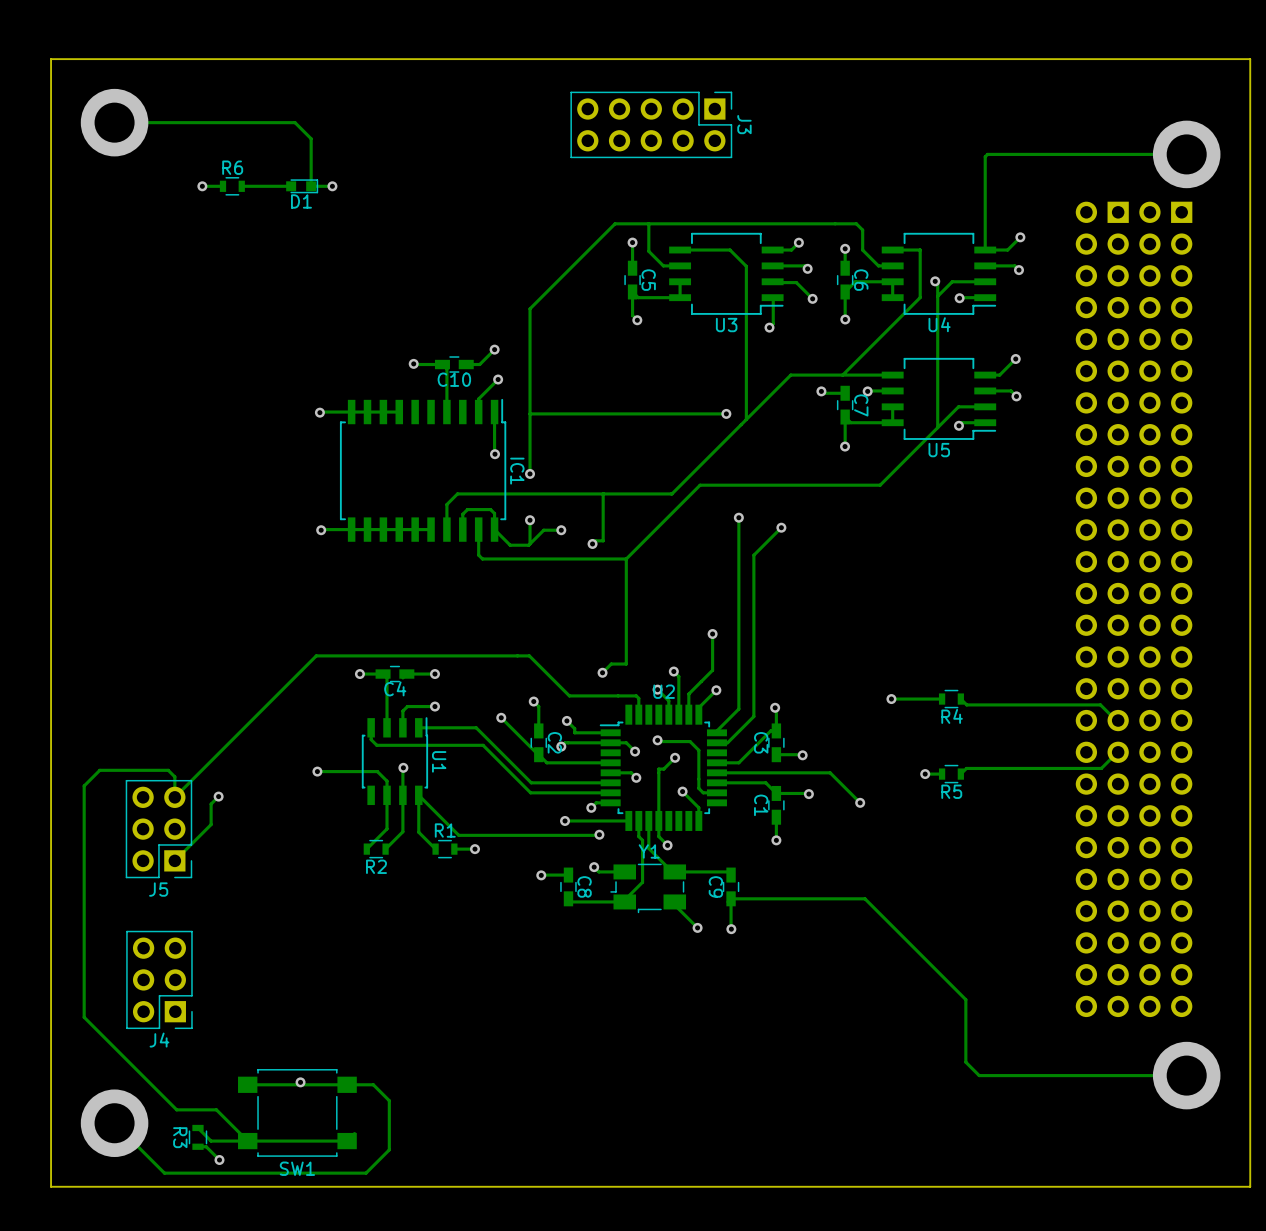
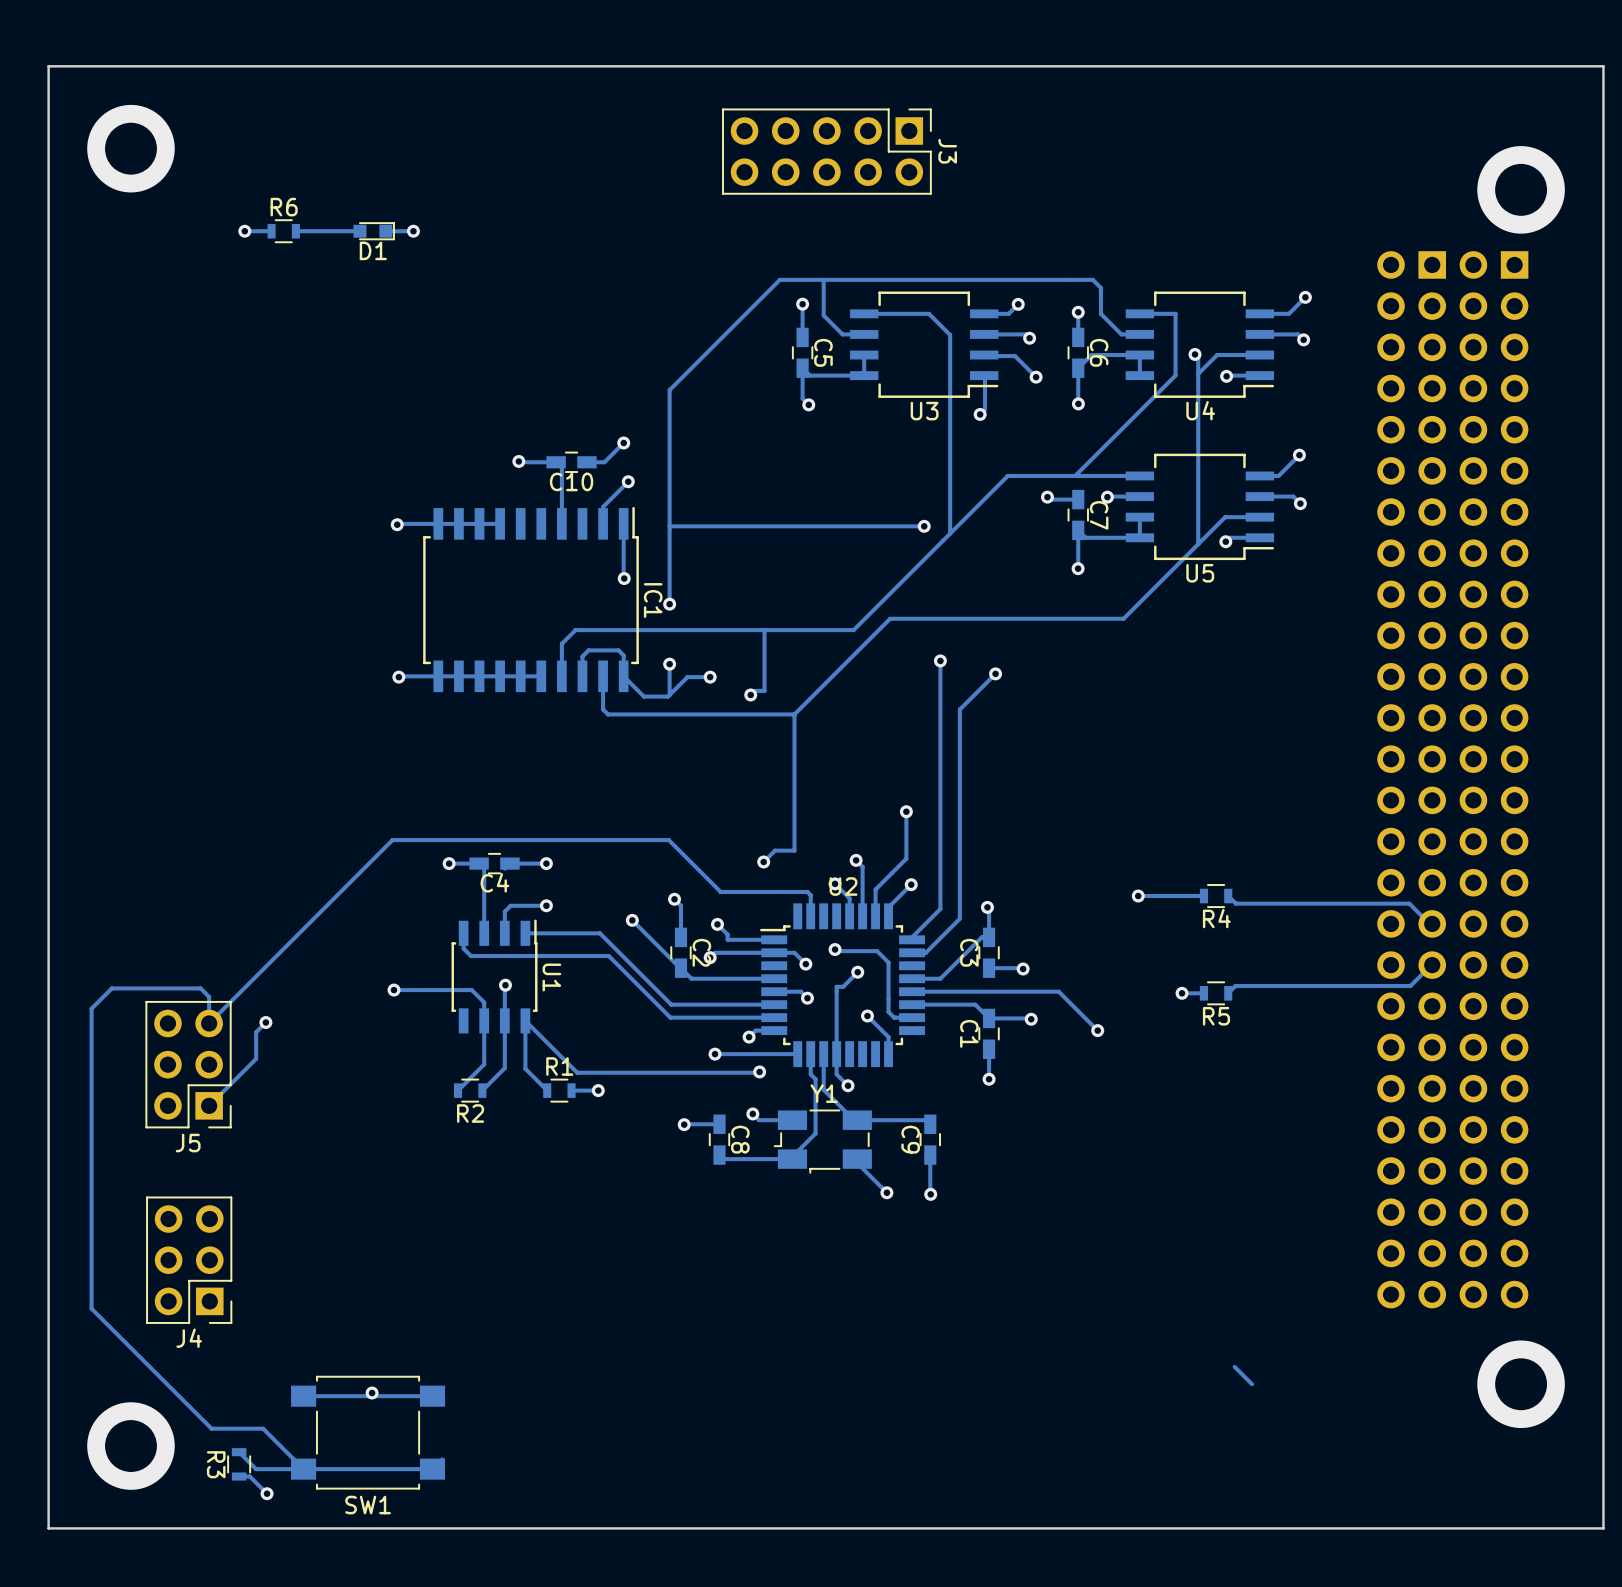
track: (114, 122) (295, 122) (311, 138) (311, 186) -> none
track: (1186, 154) (987, 154) (985, 156) (985, 250) -> none
track: (731, 898) (864, 898) (965, 999) (965, 1062) -> none
track: (1186, 1075) (979, 1075) -> none
track: (347, 1084) (373, 1084) (389, 1100) (389, 1149) (366, 1173) (164, 1173) (114, 1123) -> none

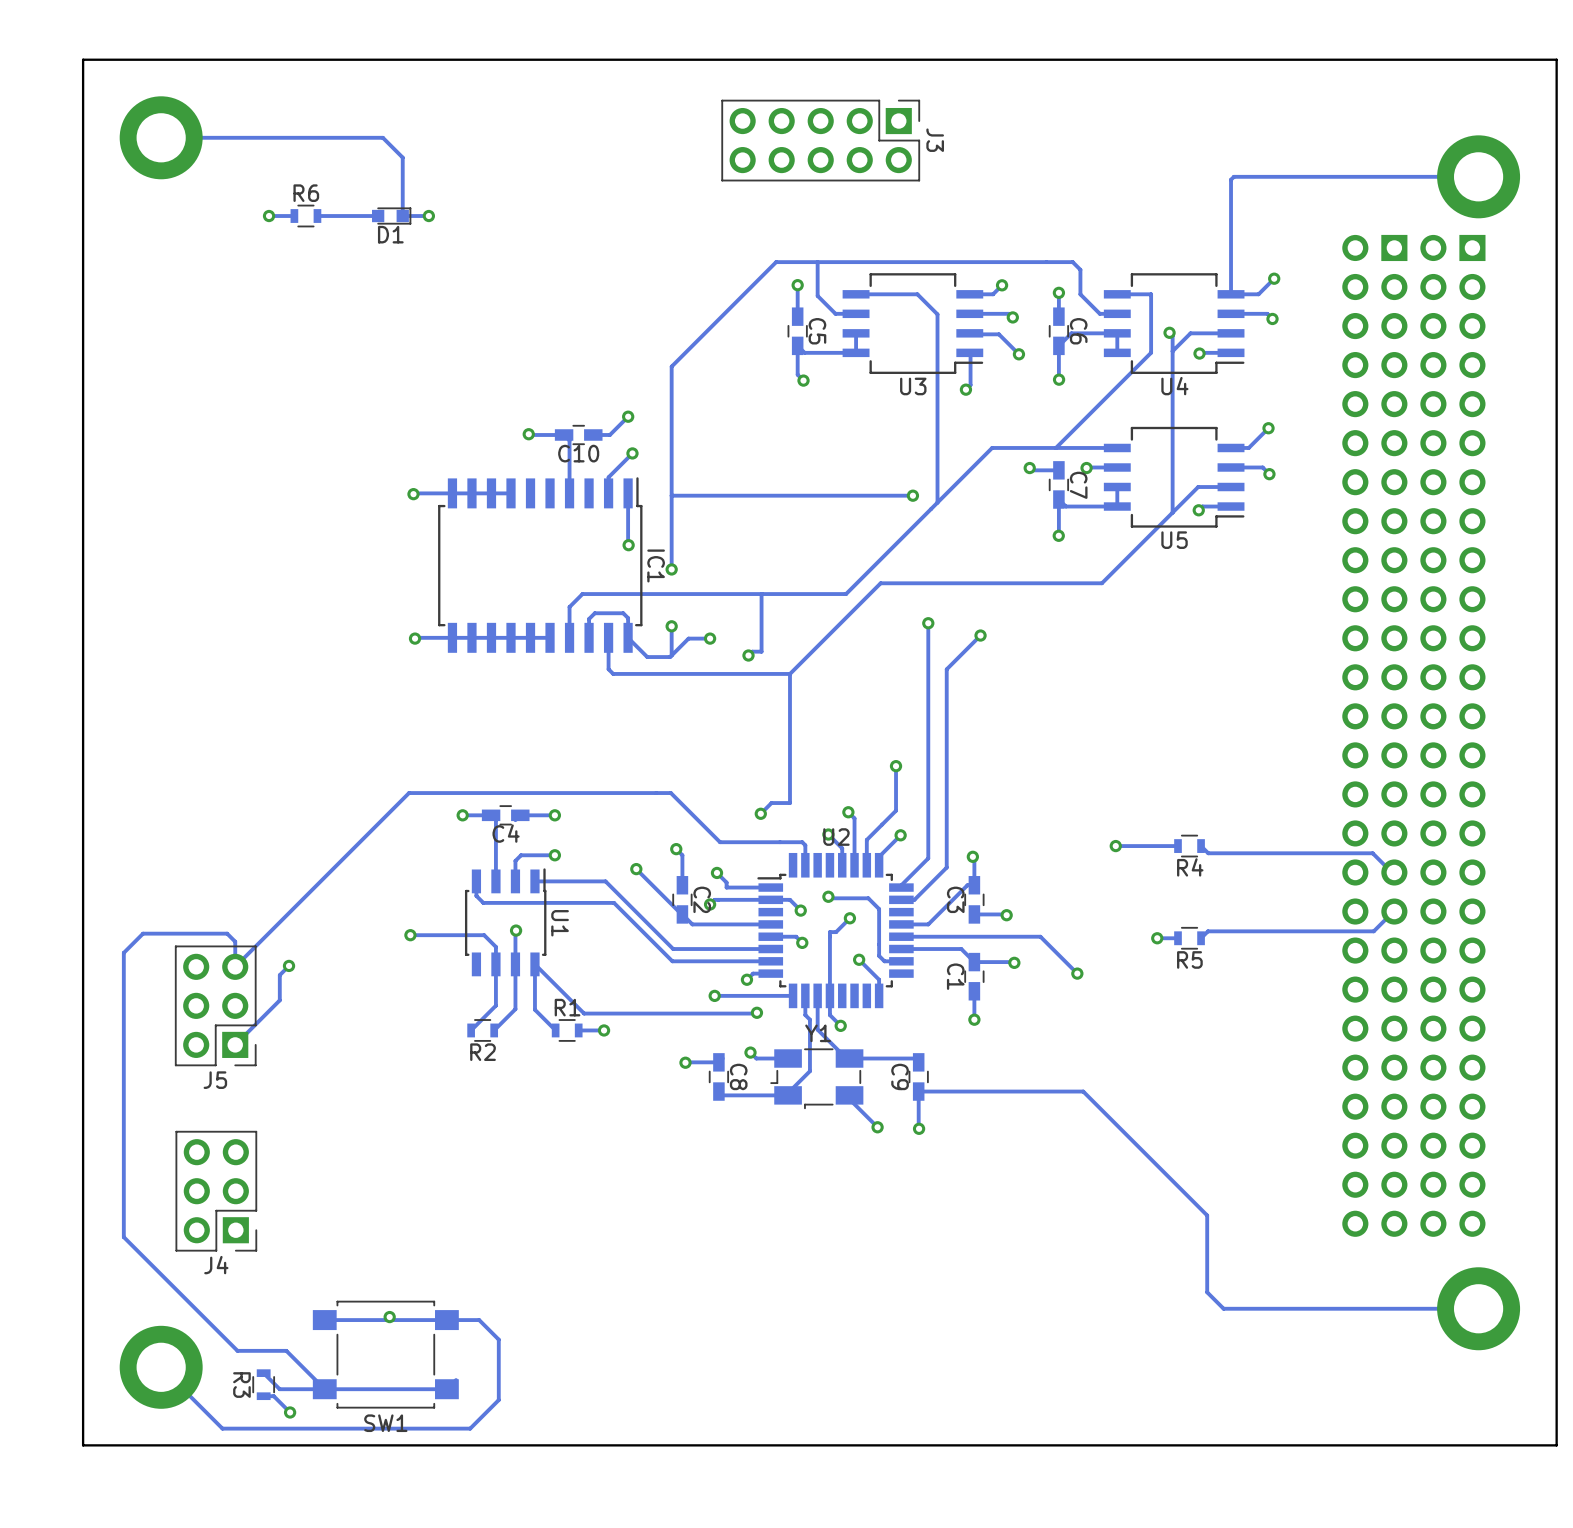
track: none -> (161, 137) (382, 137) (402, 157) (402, 216)
track: none -> (1478, 176) (1233, 176) (1231, 179) (1231, 294)
track: none -> (918, 1091) (1083, 1091) (1207, 1215) (1207, 1292)
track: none -> (1478, 1308) (1223, 1308)
track: none -> (446, 1320) (479, 1320) (498, 1339) (498, 1400) (470, 1428) (222, 1428) (161, 1367)

